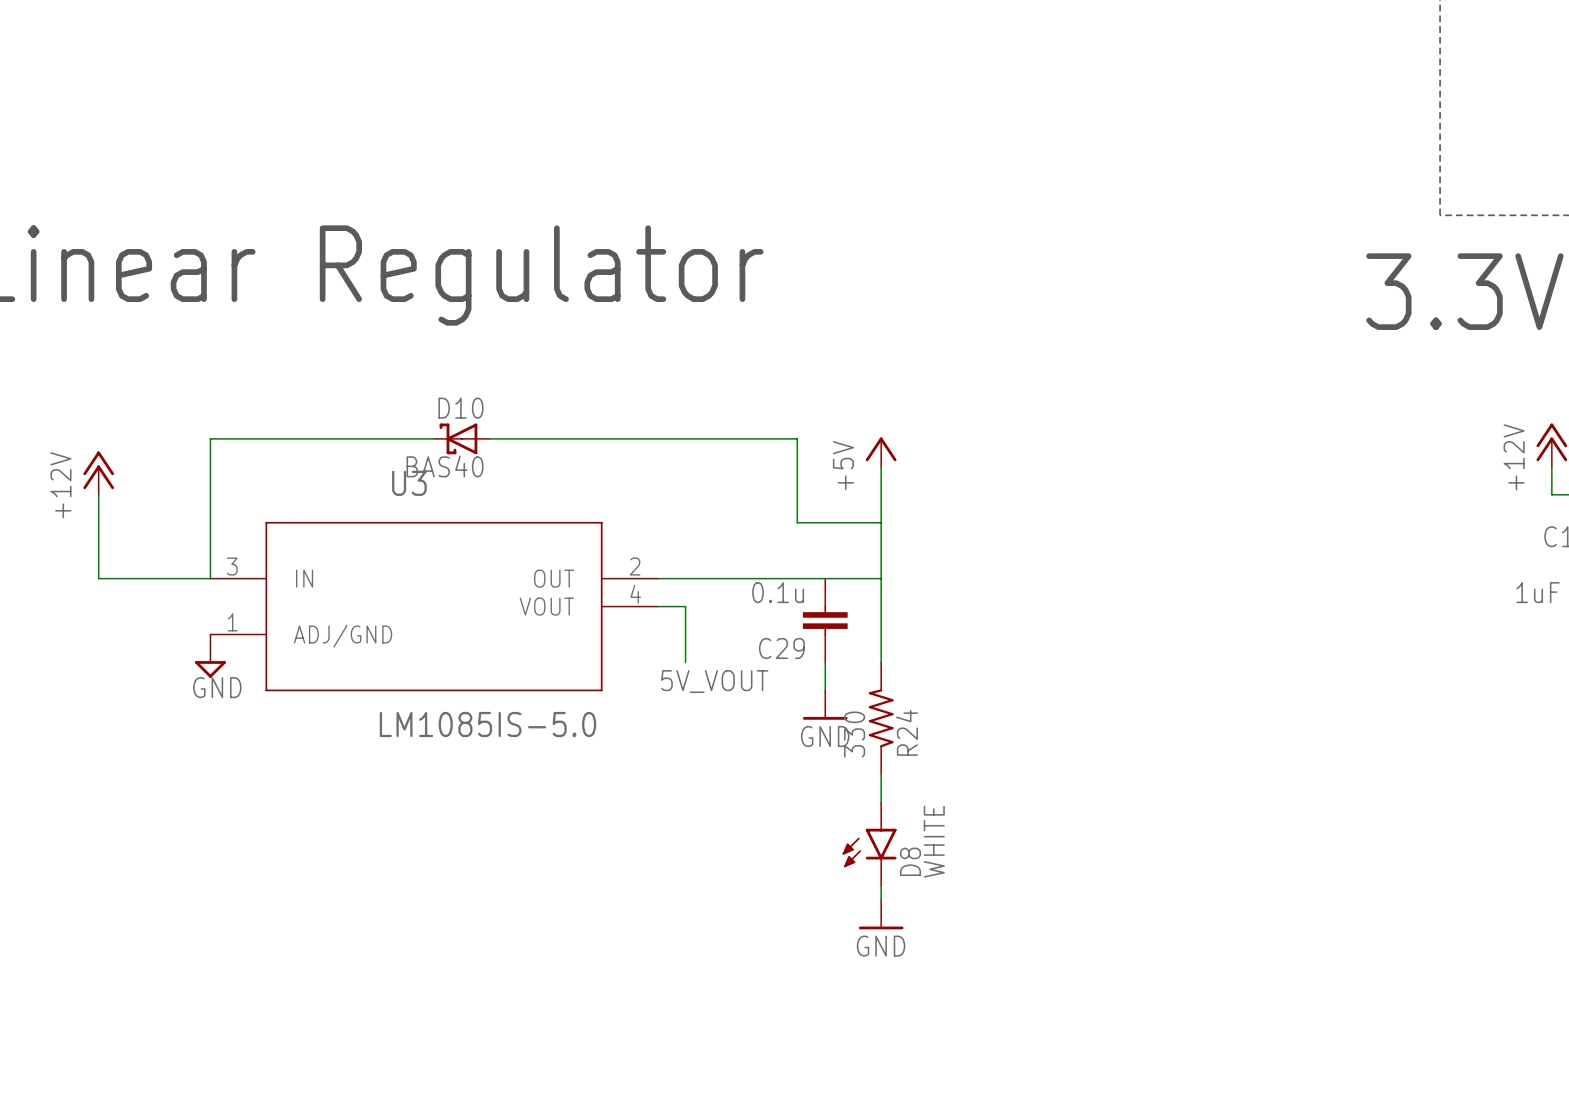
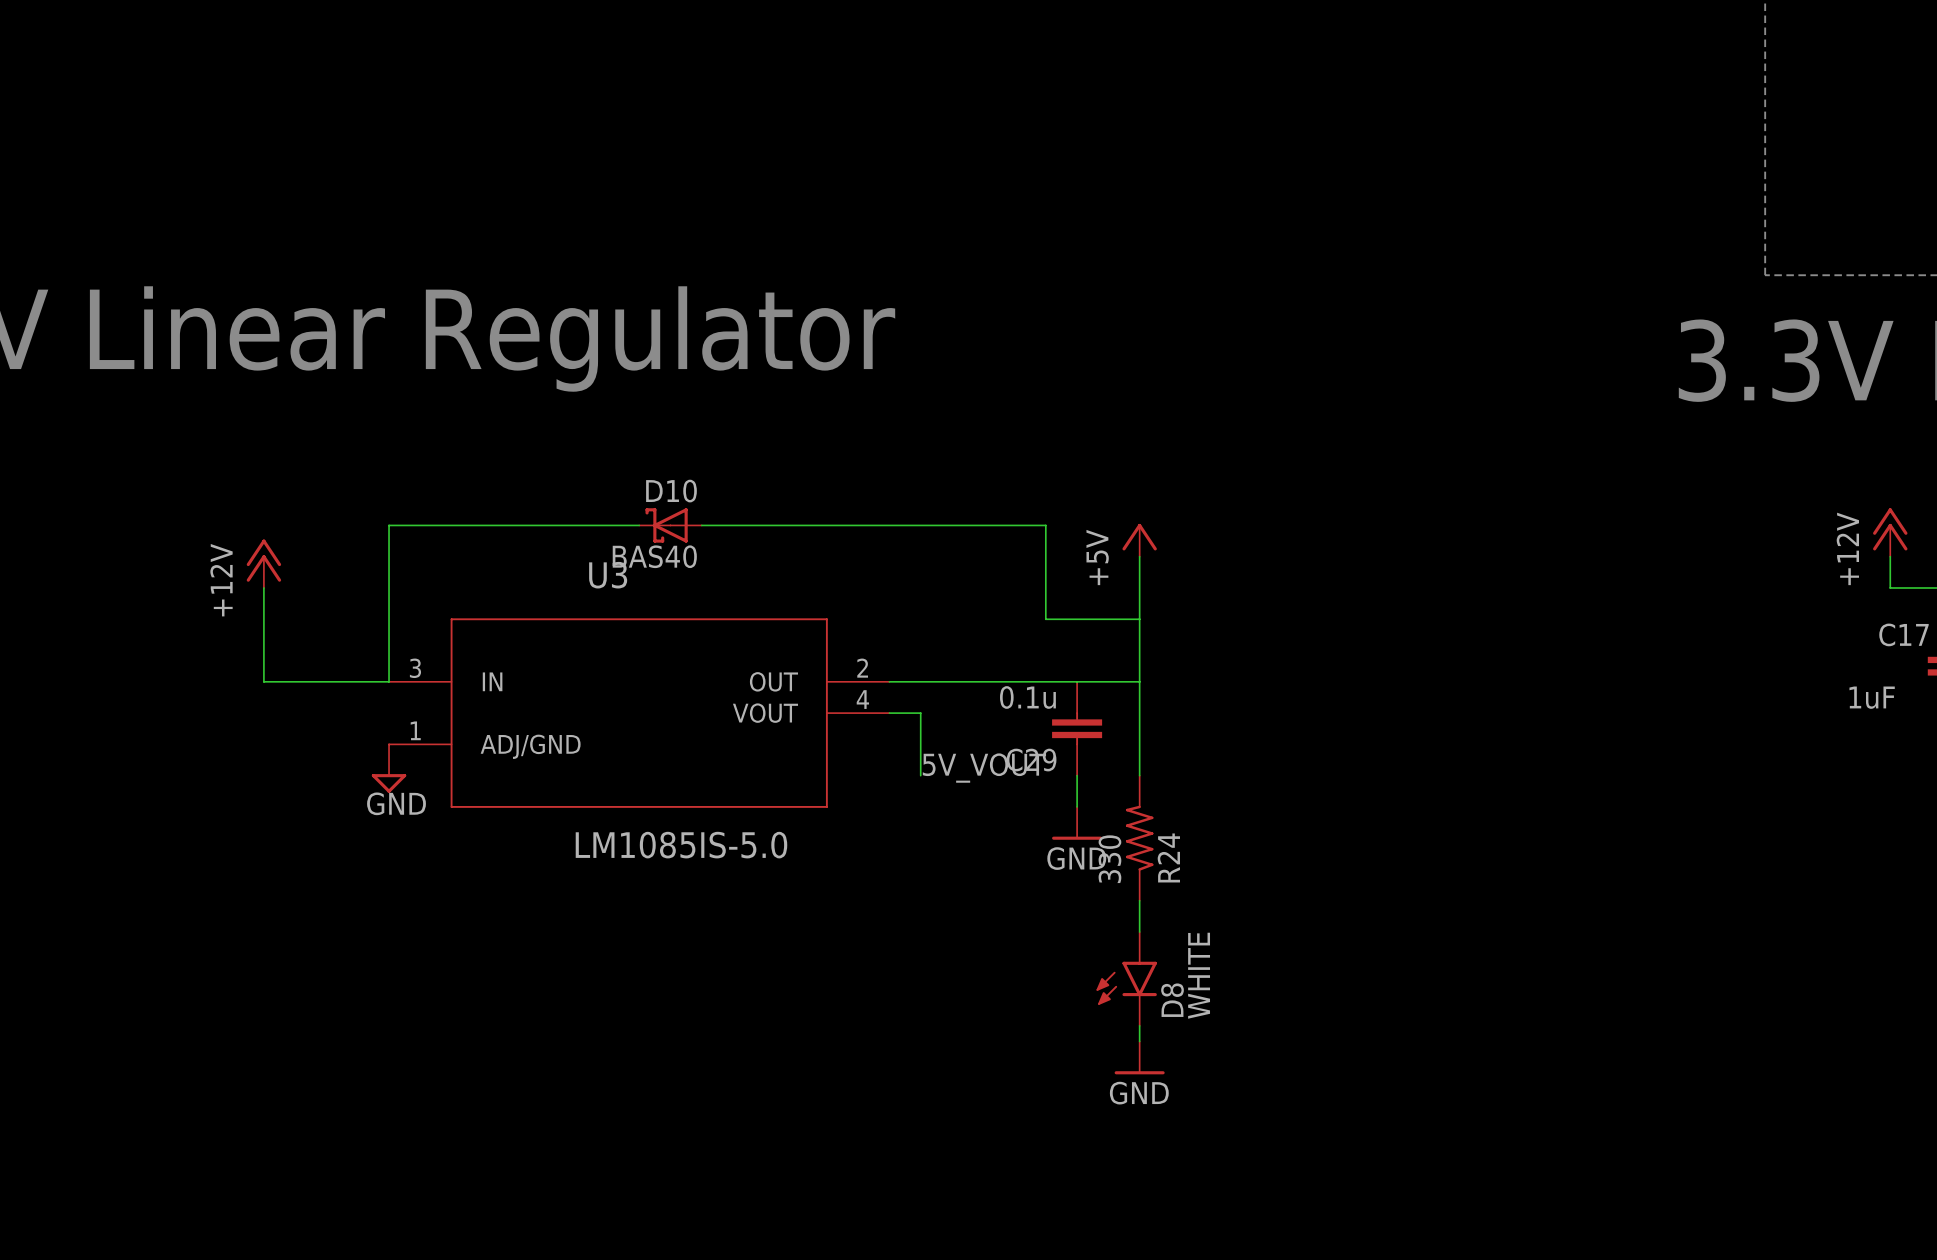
label position: 5V_VOUT (714, 681) -> 5V_VOUT (984, 768)

